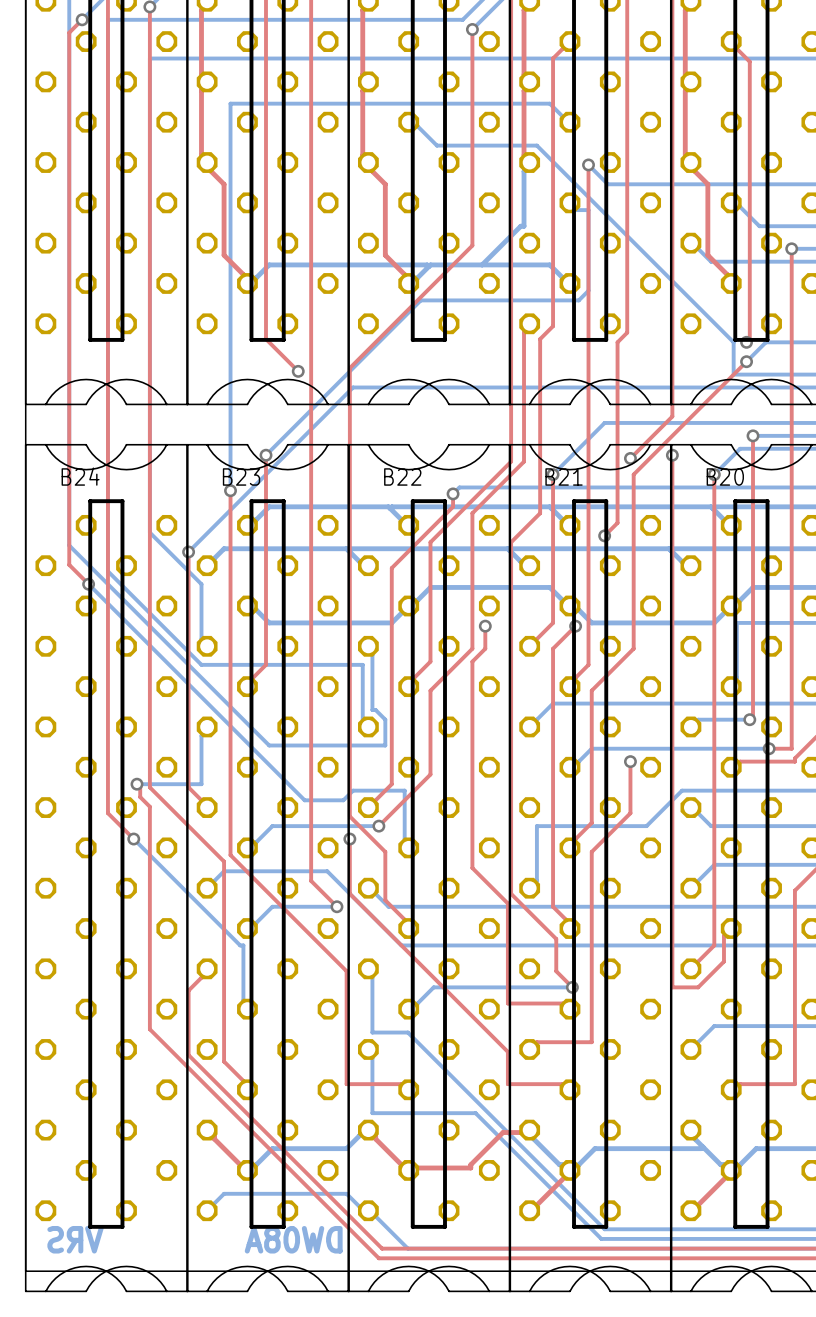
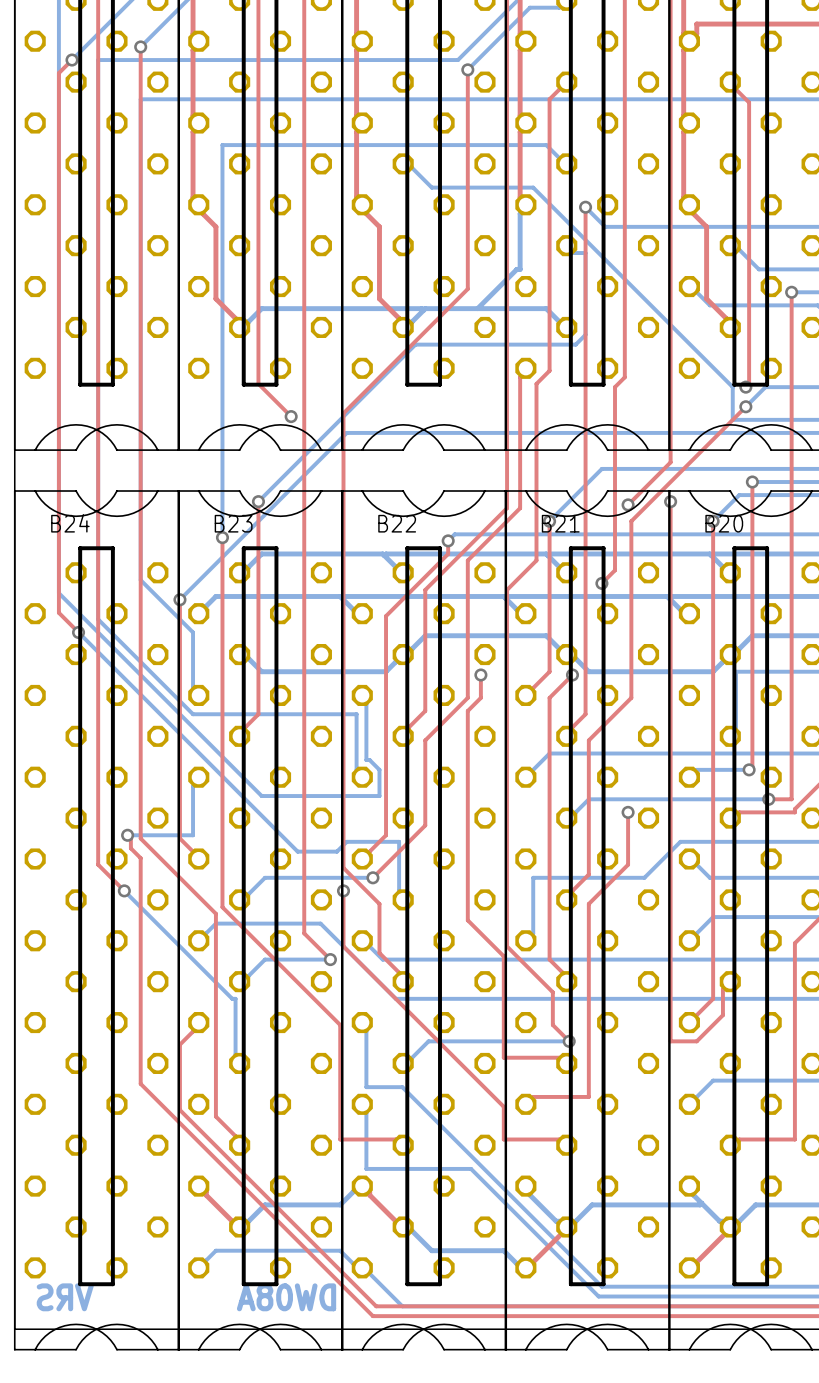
top track: (529, 1130) (528, 1132) (503, 1132) (470, 1164) (470, 1168) (409, 1168) (408, 1170) -> none
bottom track: none -> (403, 1226) (412, 1231) (431, 1250) (503, 1250) (516, 1263) (525, 1267)

